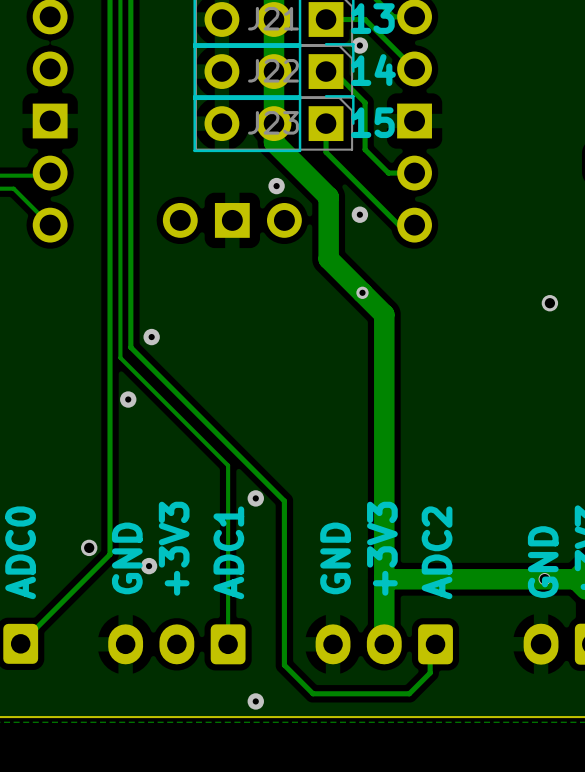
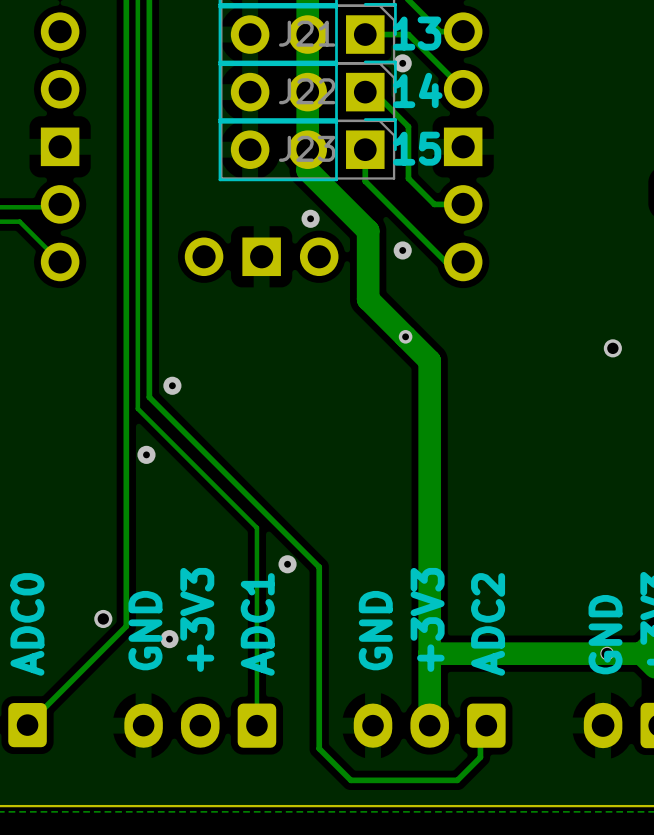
via: (255, 701) -> none

